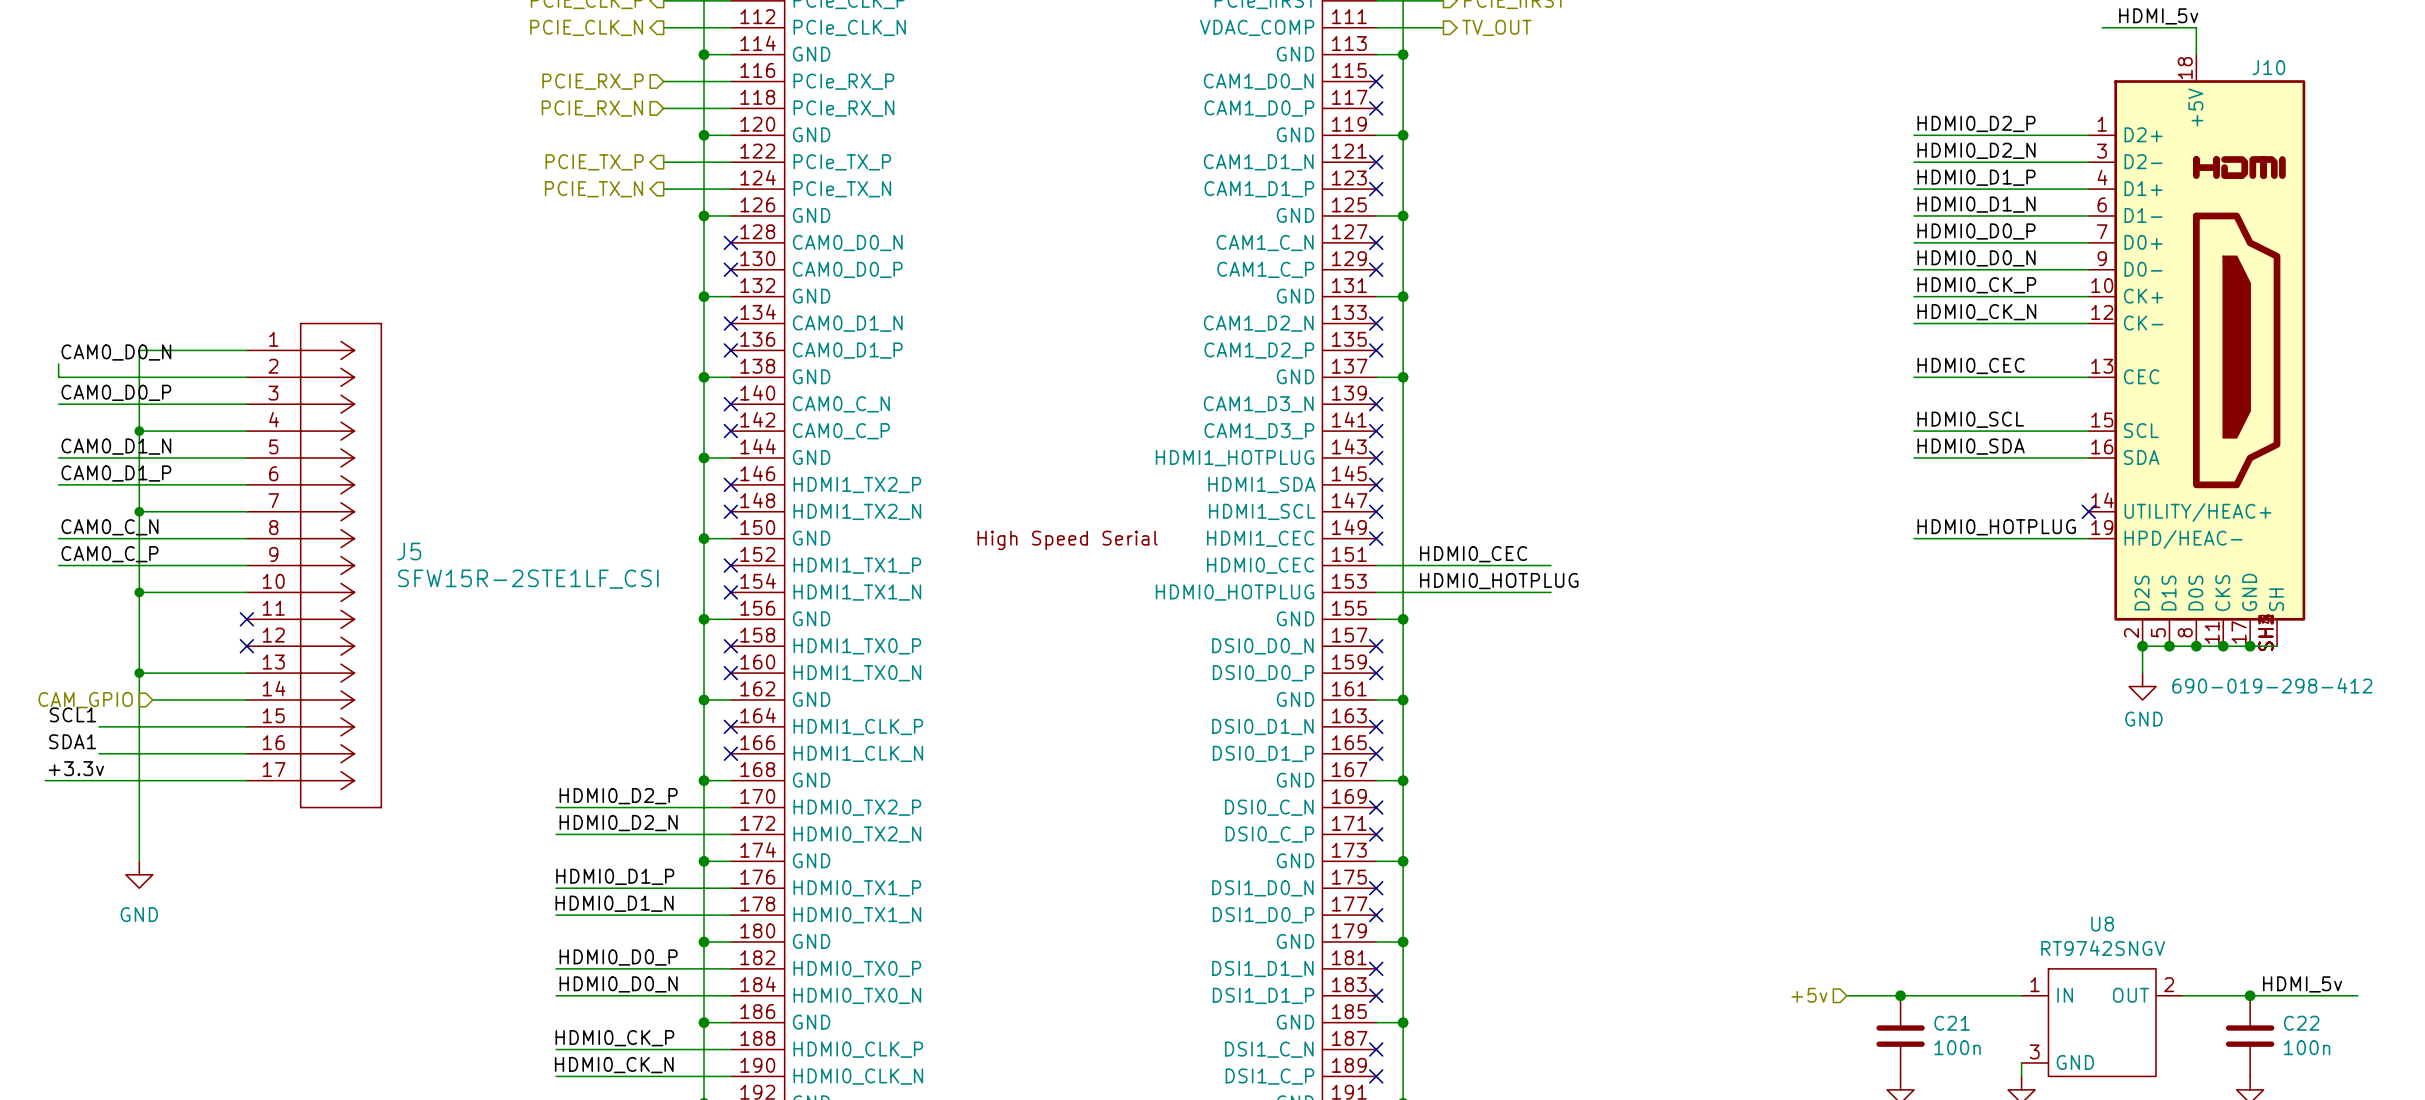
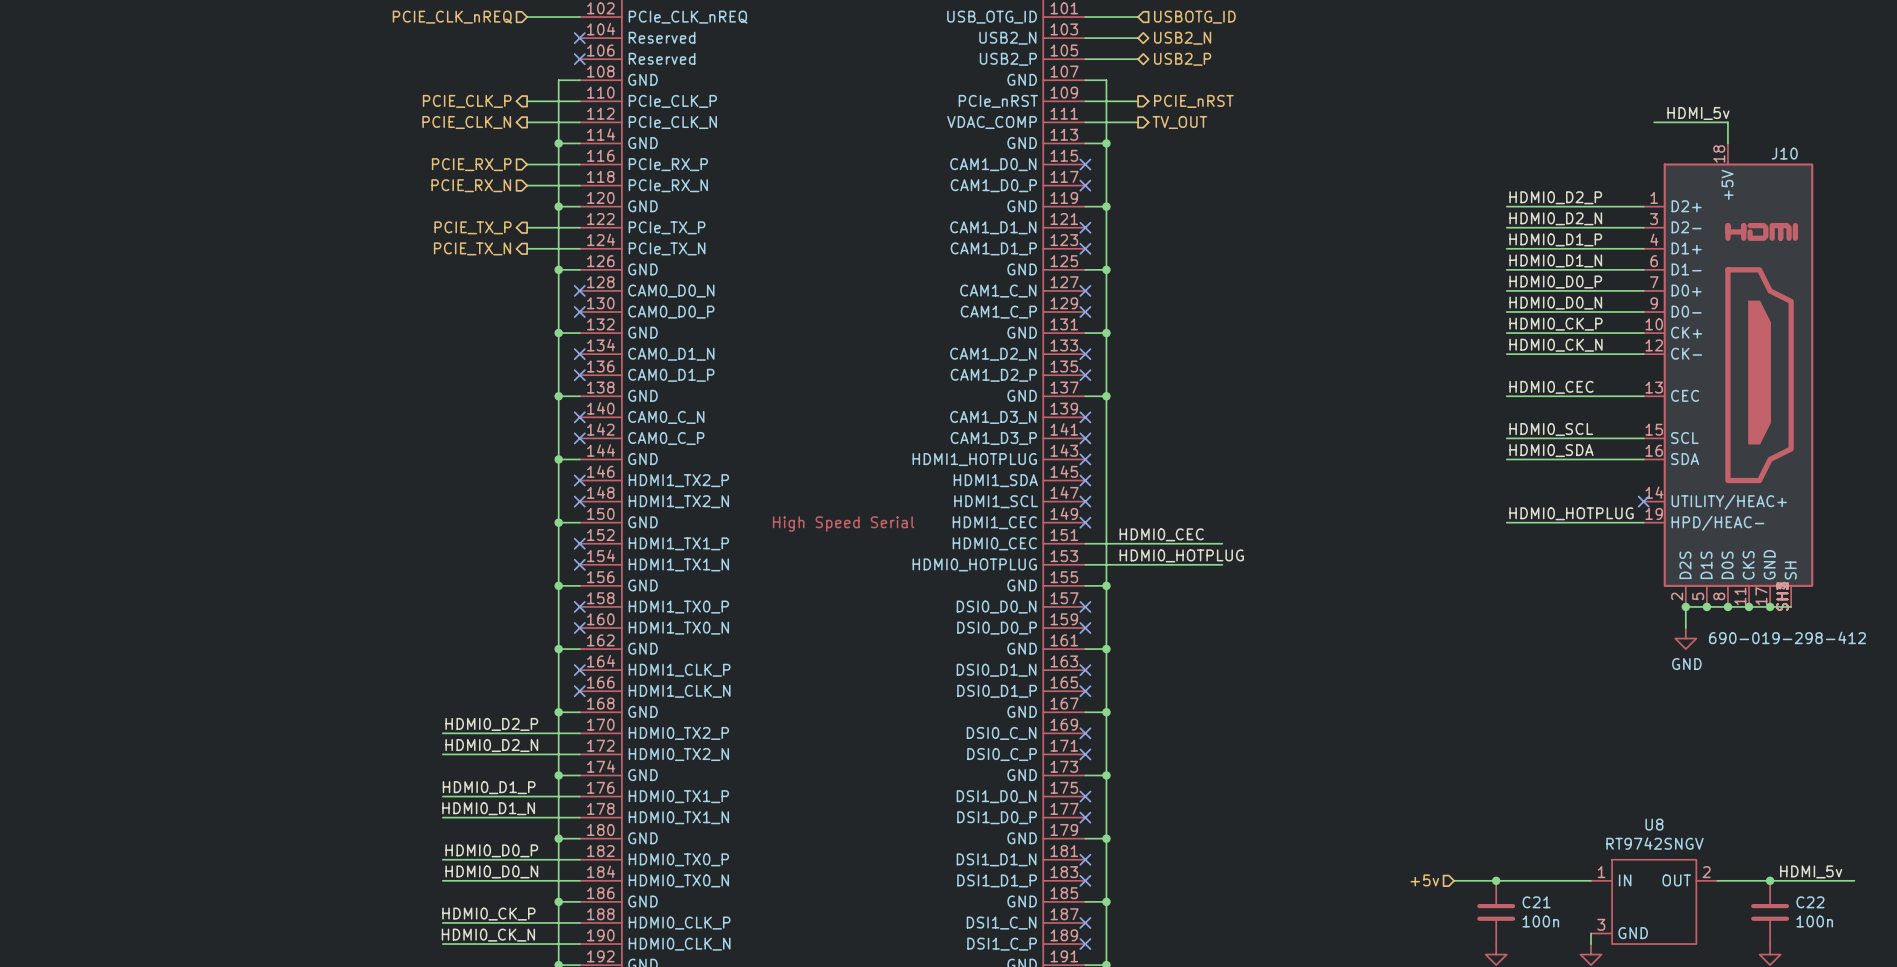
wire: (246, 350) (139, 350) (139, 861) -> none
label: CAM0_D0_N (116, 352) -> none
wire: (58, 363) (58, 377) (246, 377) -> none
label: CAM0_D0_P (116, 392) -> none
wire: (58, 404) (246, 404) -> none
wire: (139, 431) (246, 431) -> none
junction: (139, 431) -> none
label: CAM0_D1_N (116, 446) -> none
wire: (58, 457) (246, 457) -> none
label: CAM0_D1_P (116, 473) -> none
wire: (58, 484) (246, 484) -> none
wire: (139, 511) (246, 511) -> none
junction: (139, 511) -> none
label: CAM0_C_N (109, 527) -> none
wire: (58, 538) (246, 538) -> none
label: CAM0_C_P (109, 554) -> none
wire: (58, 565) (246, 565) -> none
J5: SFW15R-2STE1LF_CSI (314, 565) -> none
wire: (139, 592) (246, 592) -> none
junction: (139, 592) -> none
no-connect mark: (246, 619) -> none
no-connect mark: (246, 646) -> none
wire: (139, 673) (246, 673) -> none
junction: (139, 673) -> none
wire: (152, 699) (246, 699) -> none
hierarchical label: CAM_GPIO (85, 700) -> none
label: SCL1 (72, 714) -> none
wire: (98, 726) (246, 726) -> none
label: SDA1 (72, 741) -> none
wire: (98, 753) (246, 753) -> none
label: +3.3v (76, 768) -> none
wire: (45, 780) (246, 780) -> none
power symbol: GND (139, 874) -> none

